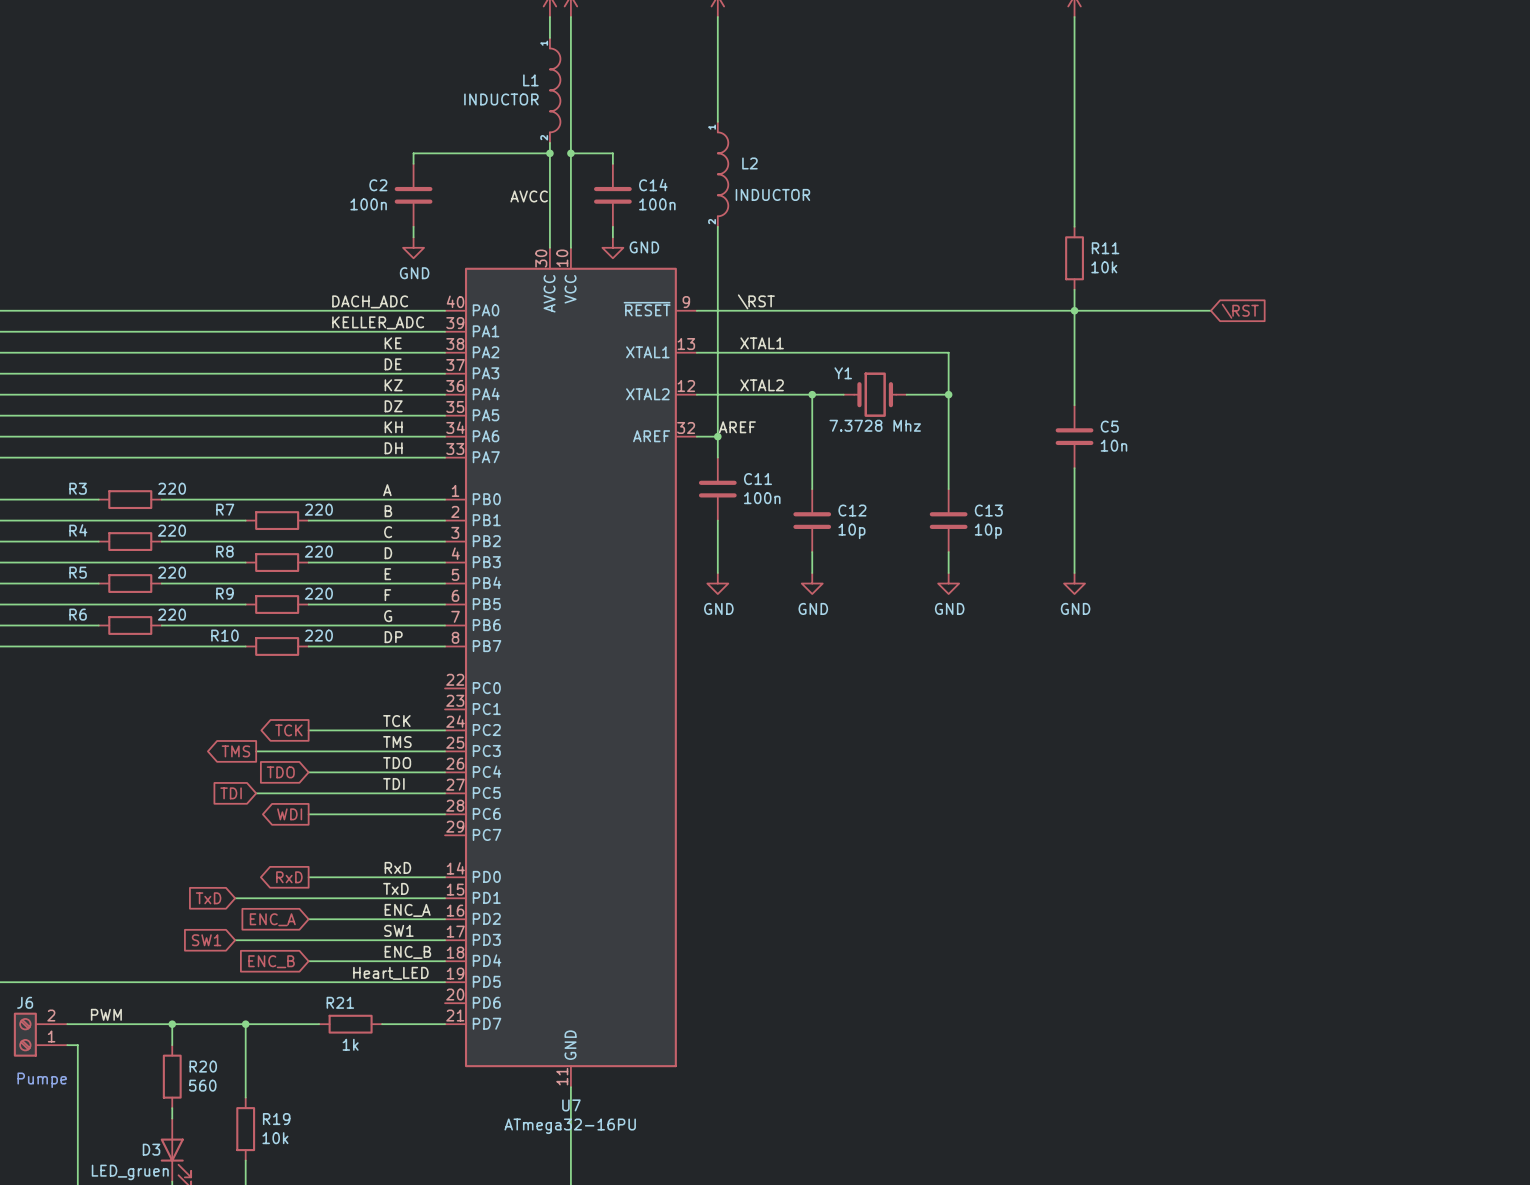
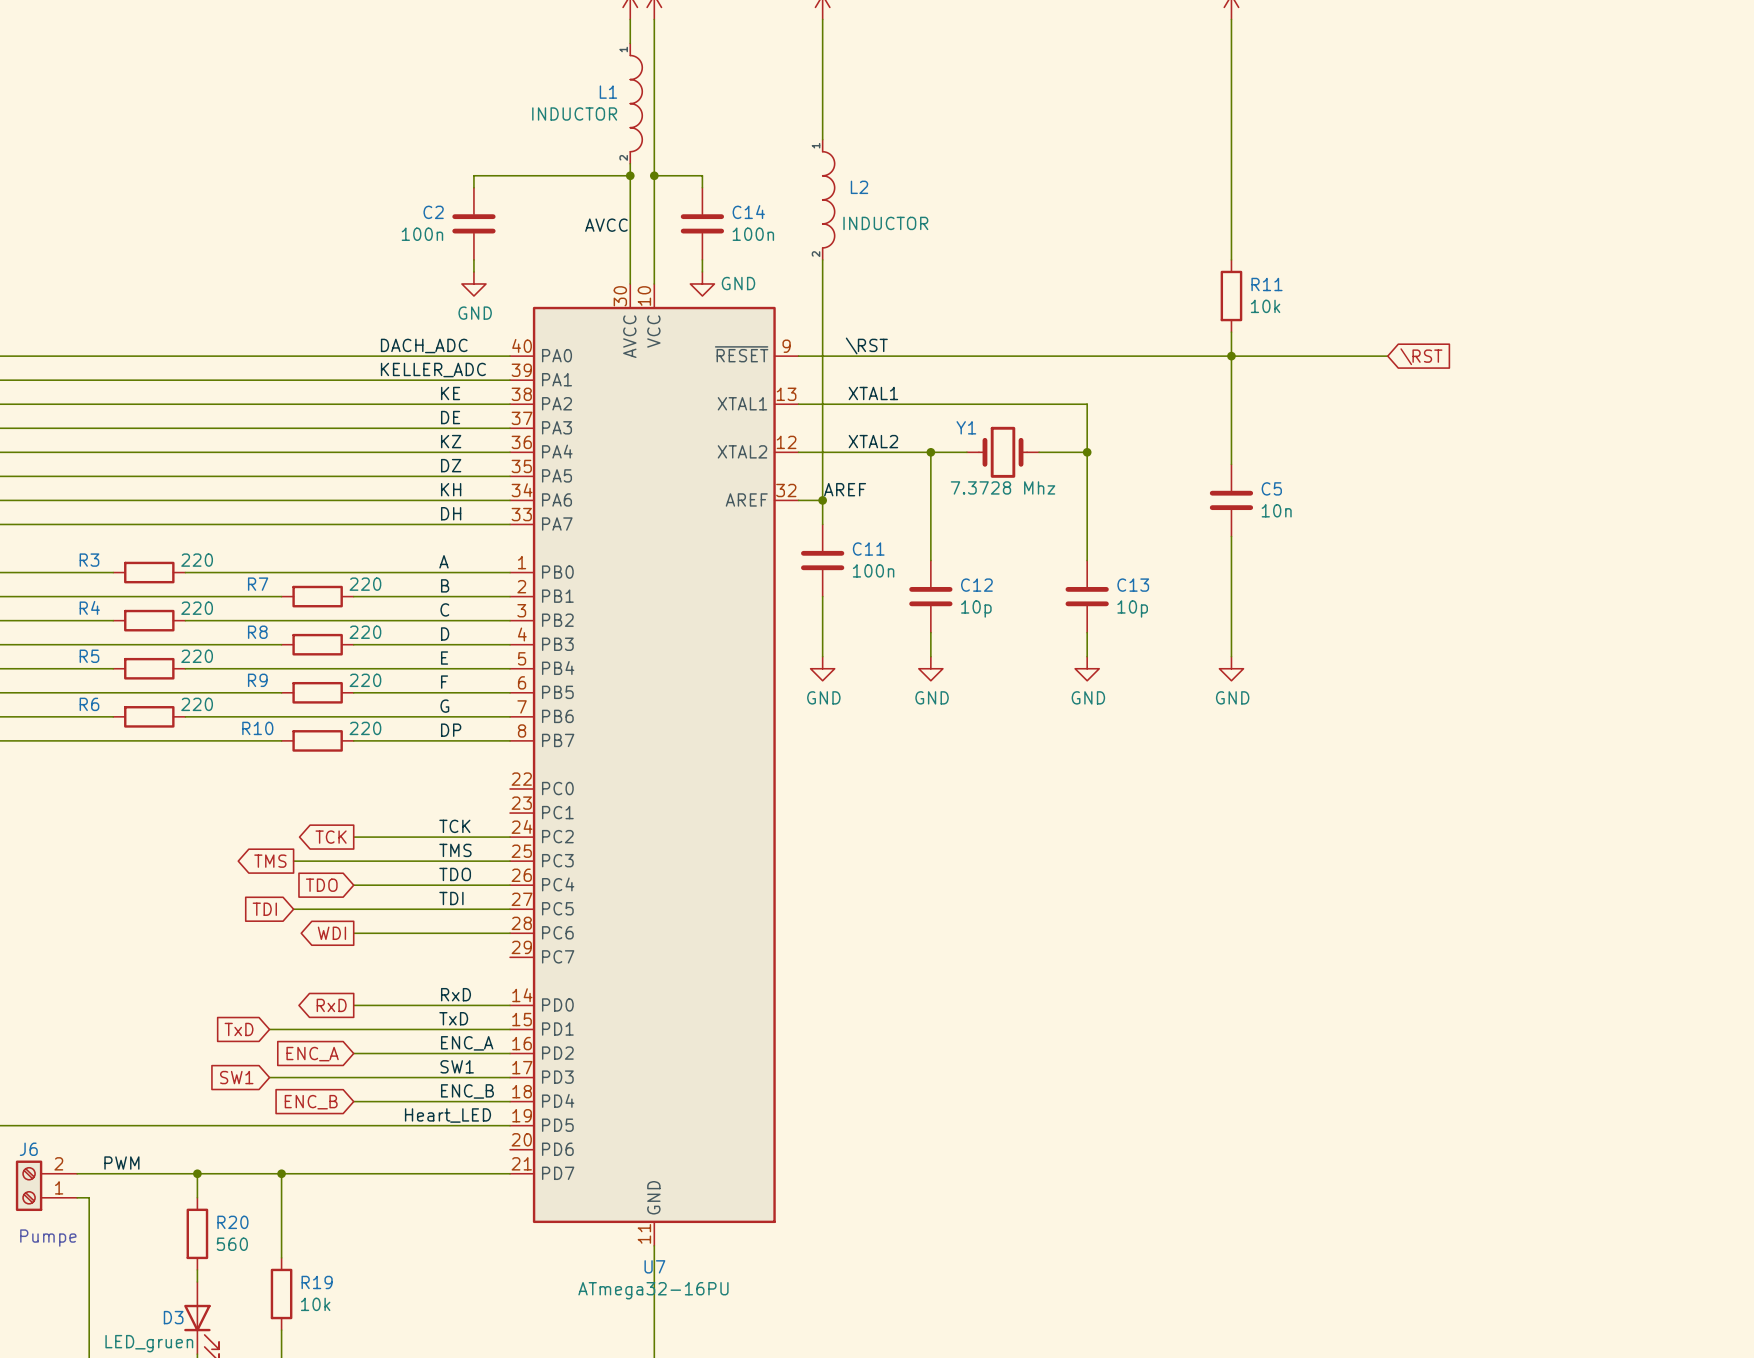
wire: none -> (365, 1173) (437, 1173)
R21: 1k (350, 1024) -> none

